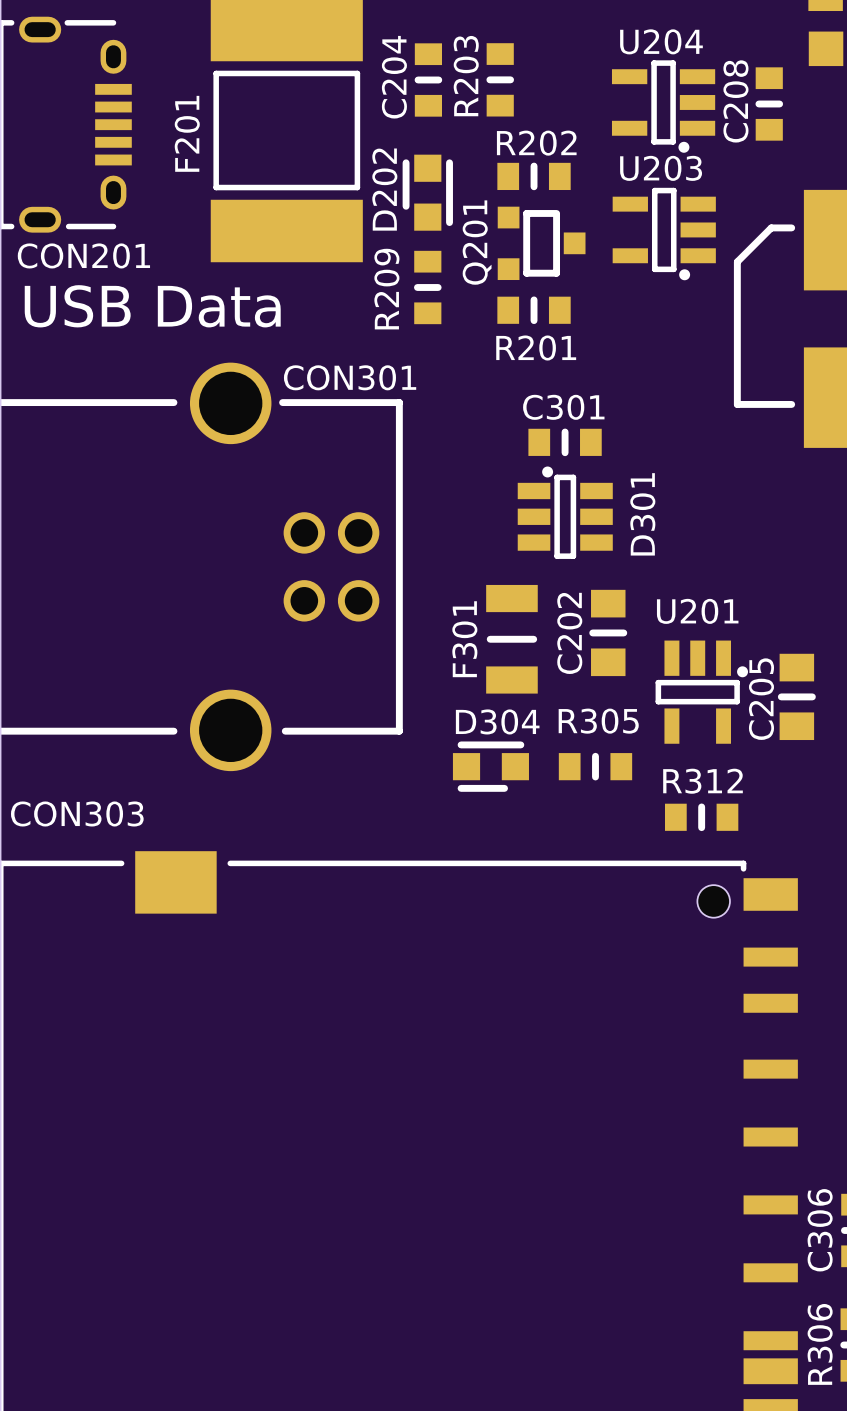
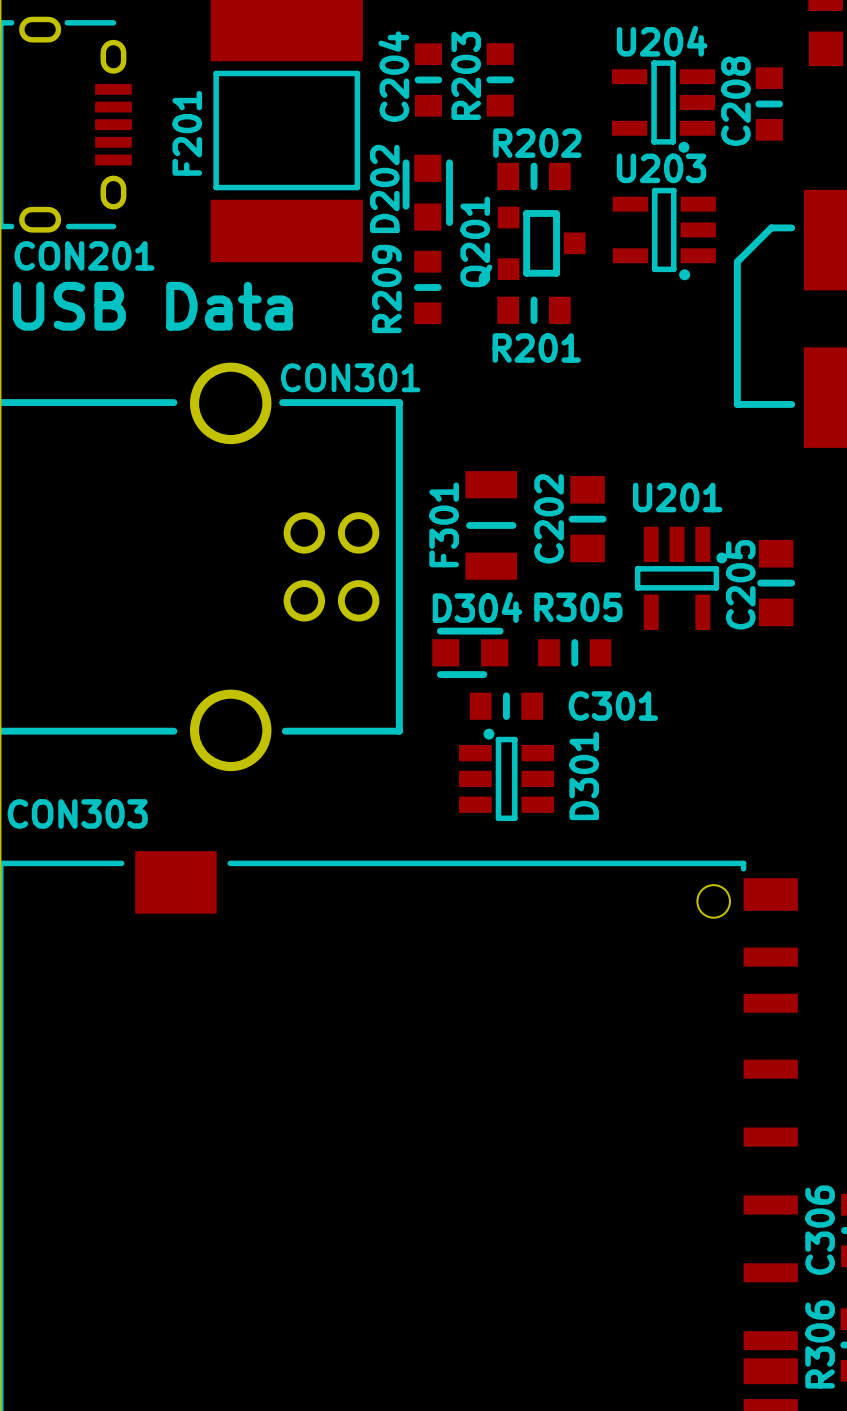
C301 name position: C301 (563, 407) -> C301 (613, 706)
C301 position: (565, 442) -> (506, 706)
D301 position: (565, 512) -> (506, 774)
C202 position: (608, 632) -> (587, 519)
F301 position: (511, 639) -> (491, 525)
U201 position: (701, 692) -> (681, 578)
C205 position: (796, 696) -> (776, 583)
D304 position: (490, 766) -> (470, 652)
R305 position: (595, 766) -> (574, 652)
R312: (701, 817) -> none

